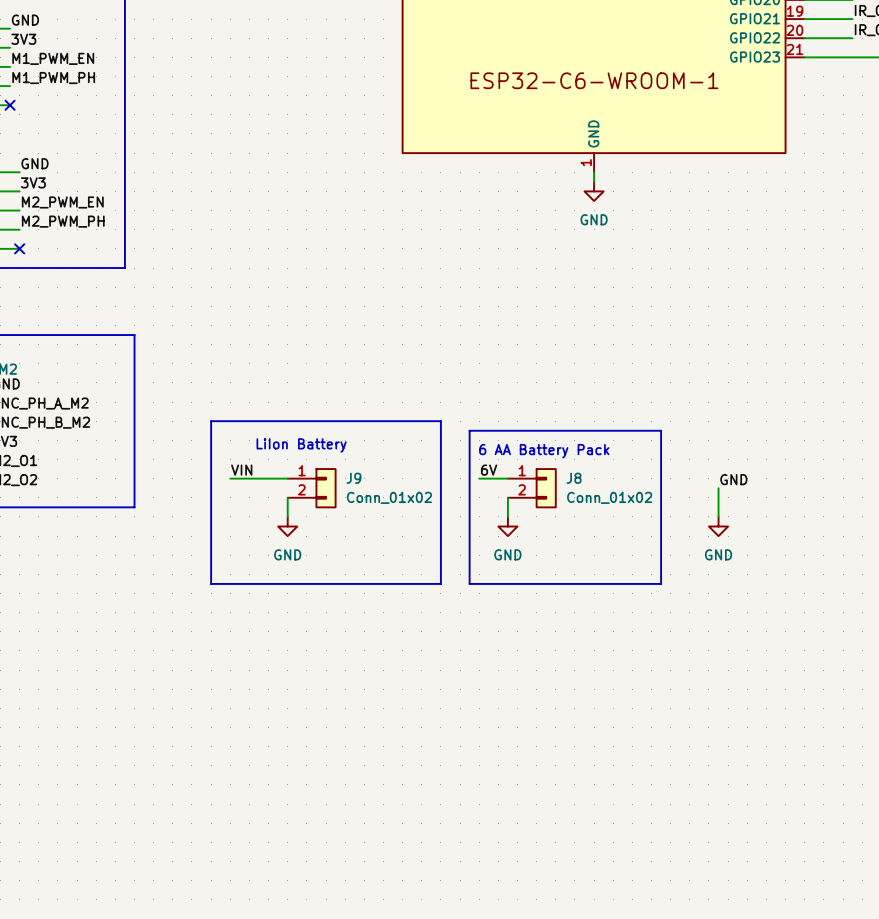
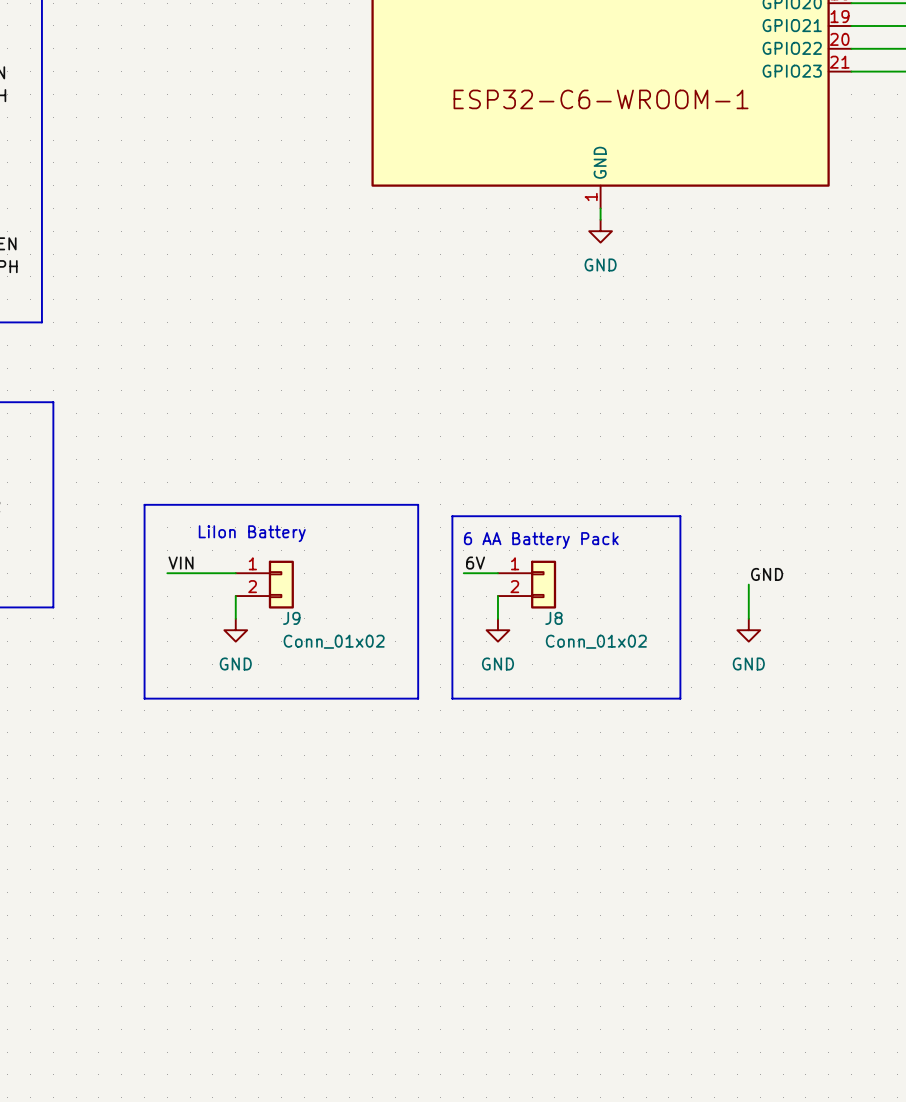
J9 name position: J9 (353, 478) -> J9 (291, 618)
J8 name position: J8 (574, 478) -> J8 (553, 618)
J9 value position: Conn_01x02 (389, 497) -> Conn_01x02 (334, 641)
J8 value position: Conn_01x02 (609, 497) -> Conn_01x02 (596, 641)

